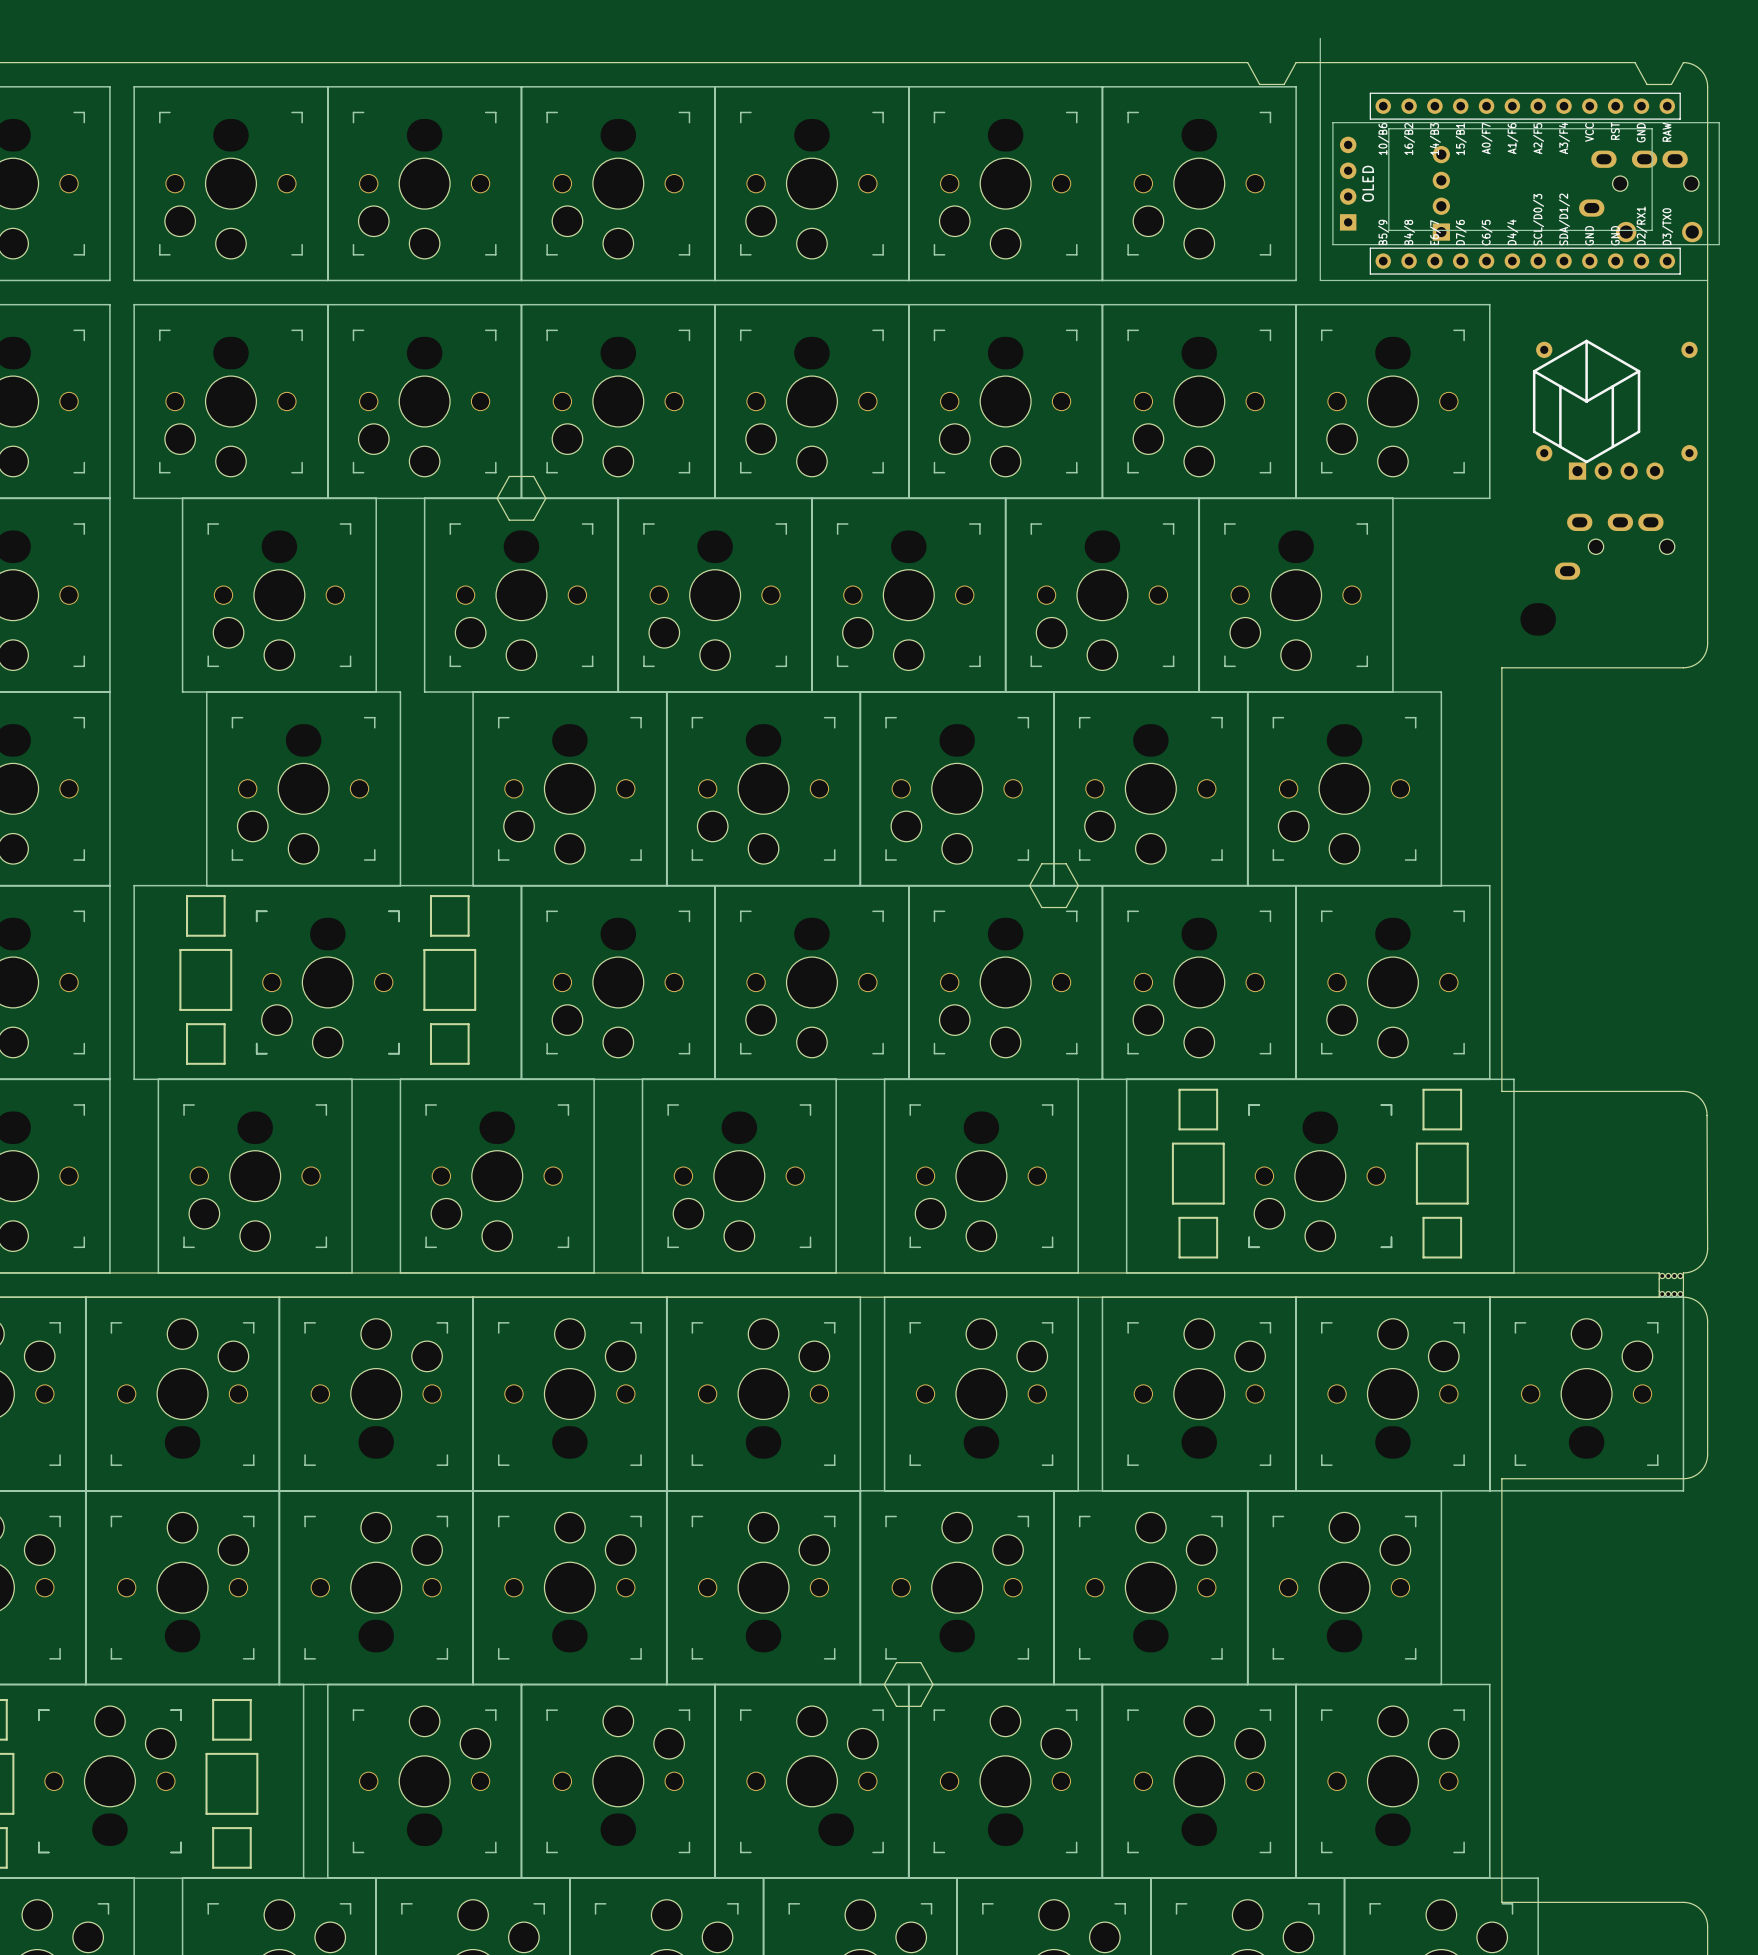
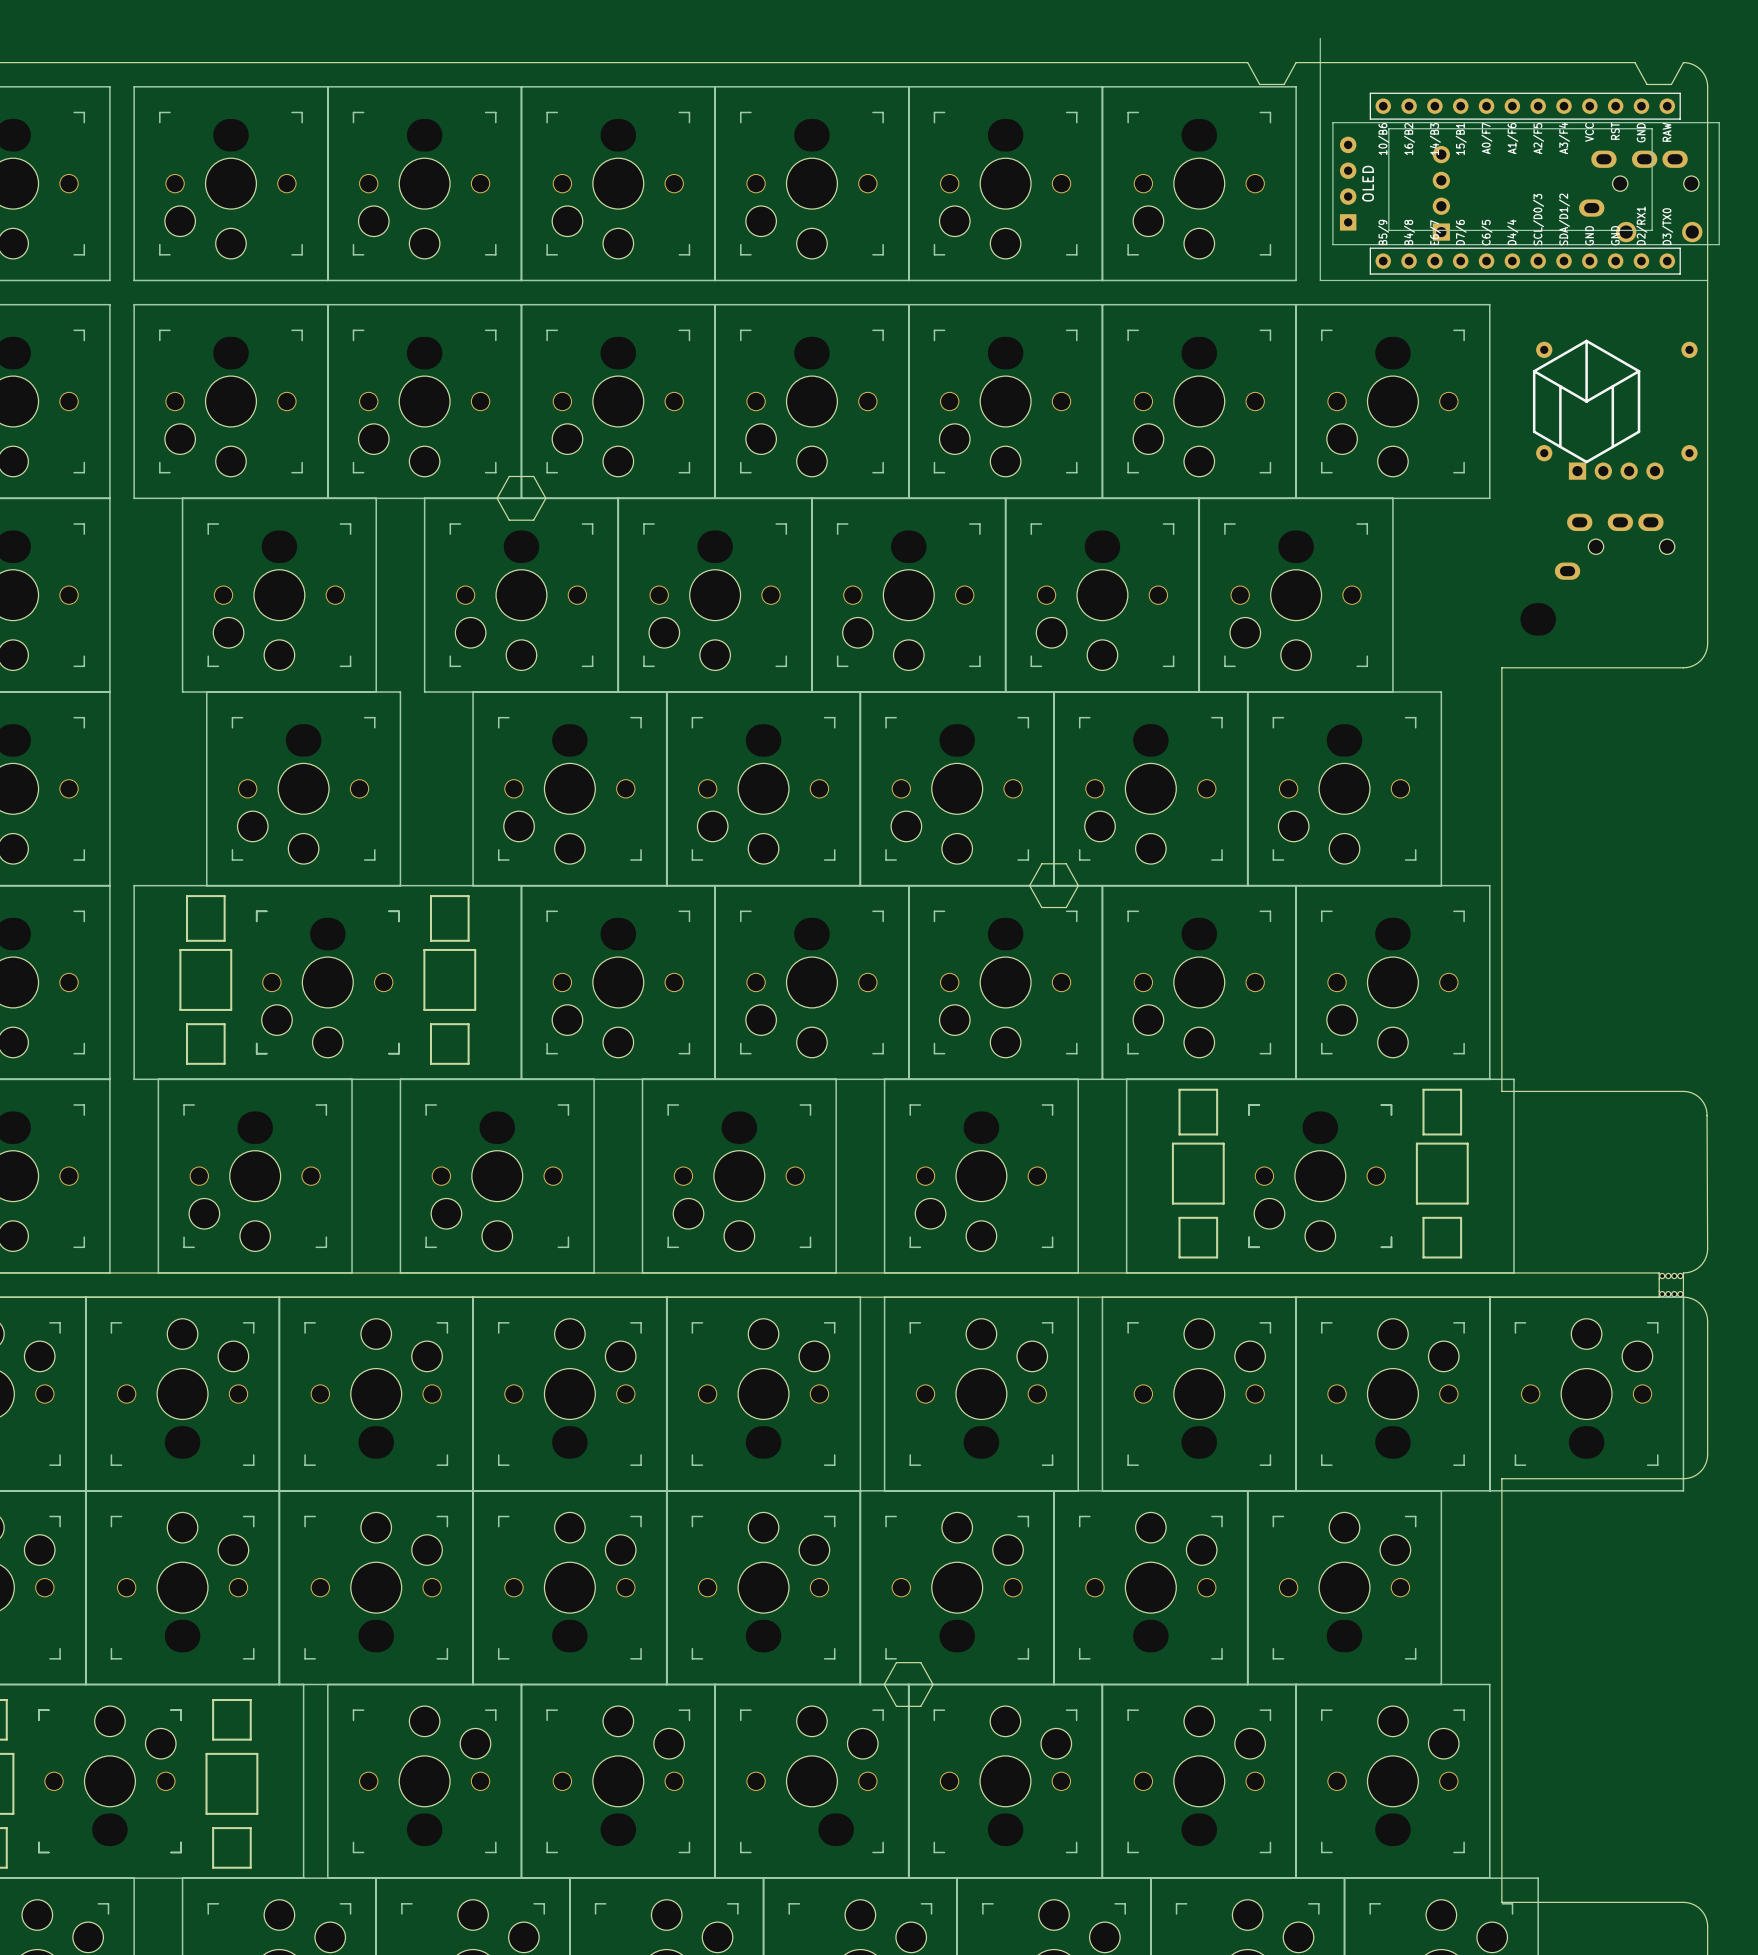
part footprint: [133, 884, 523, 1081] -> [133, 884, 523, 1081]
part footprint: [1125, 1078, 1515, 1274] -> [1125, 1078, 1515, 1274]

